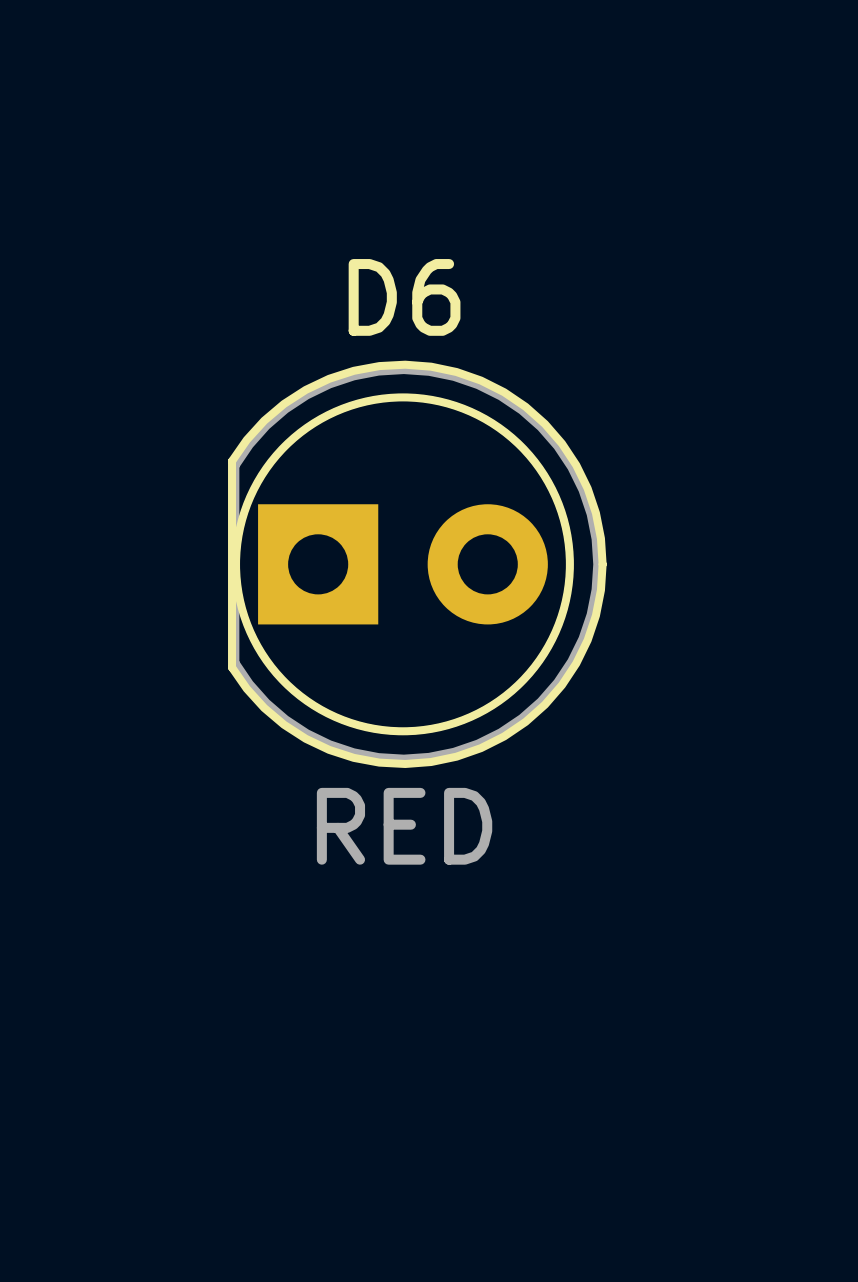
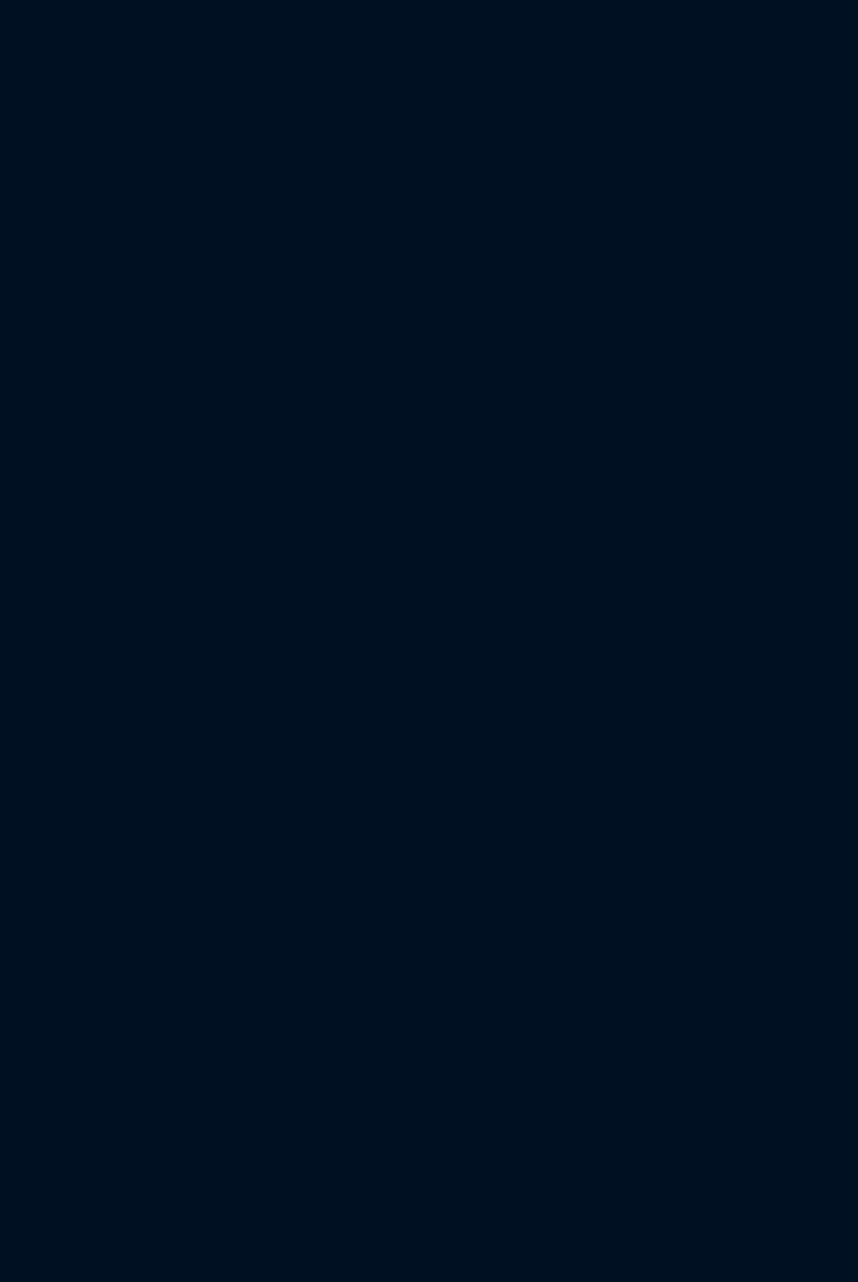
D6: RED (417, 564) -> none

